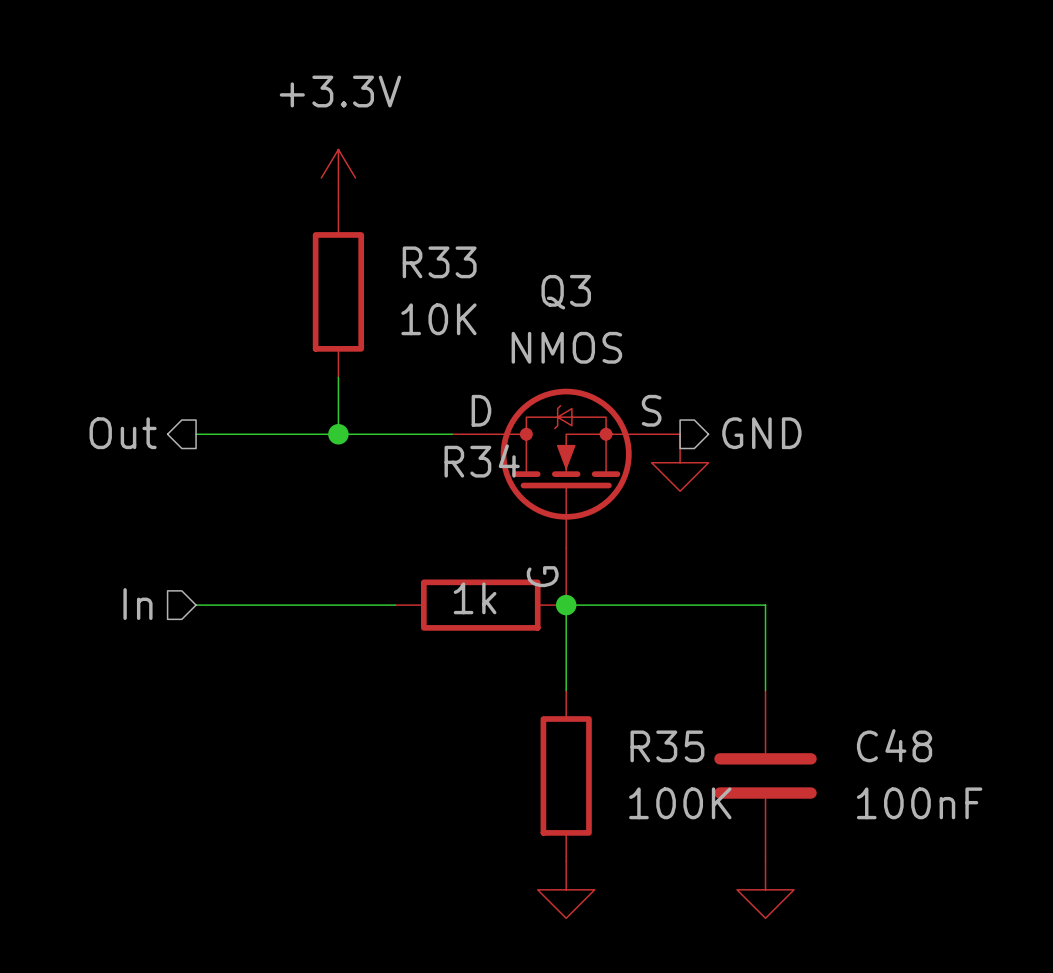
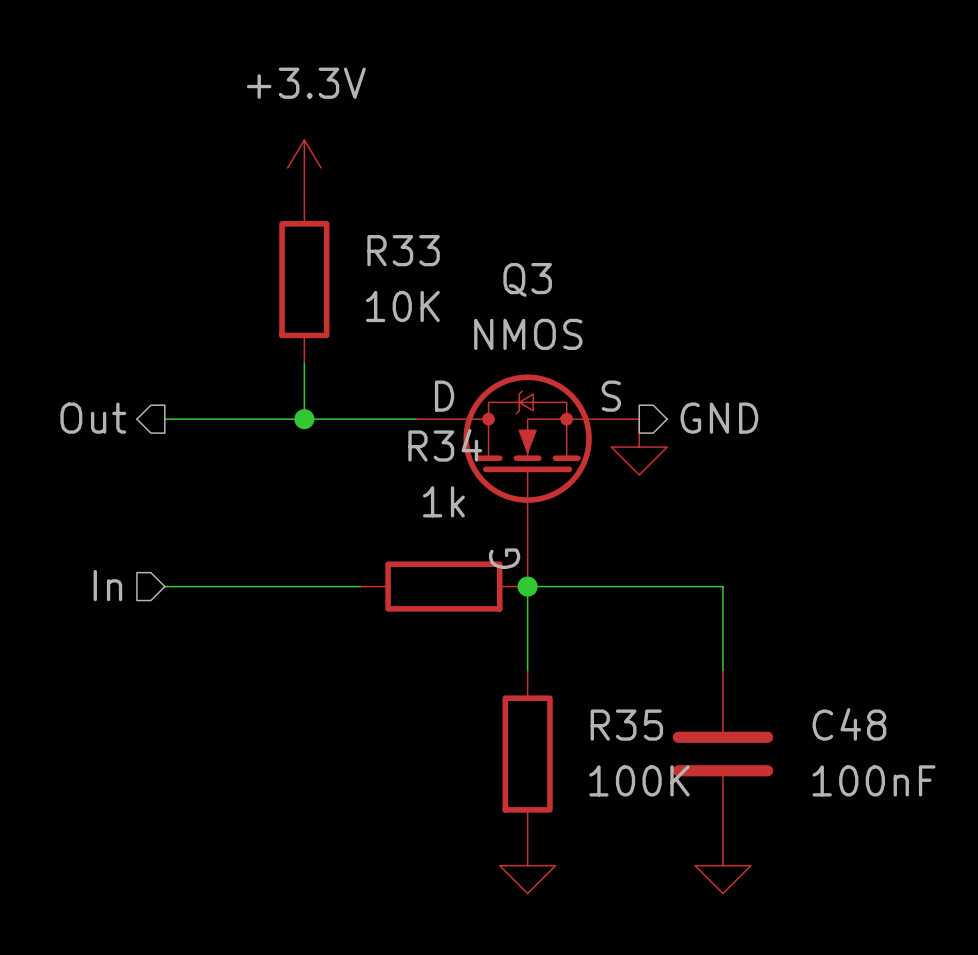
R34 value position: 1k (475, 598) -> 1k (443, 501)

